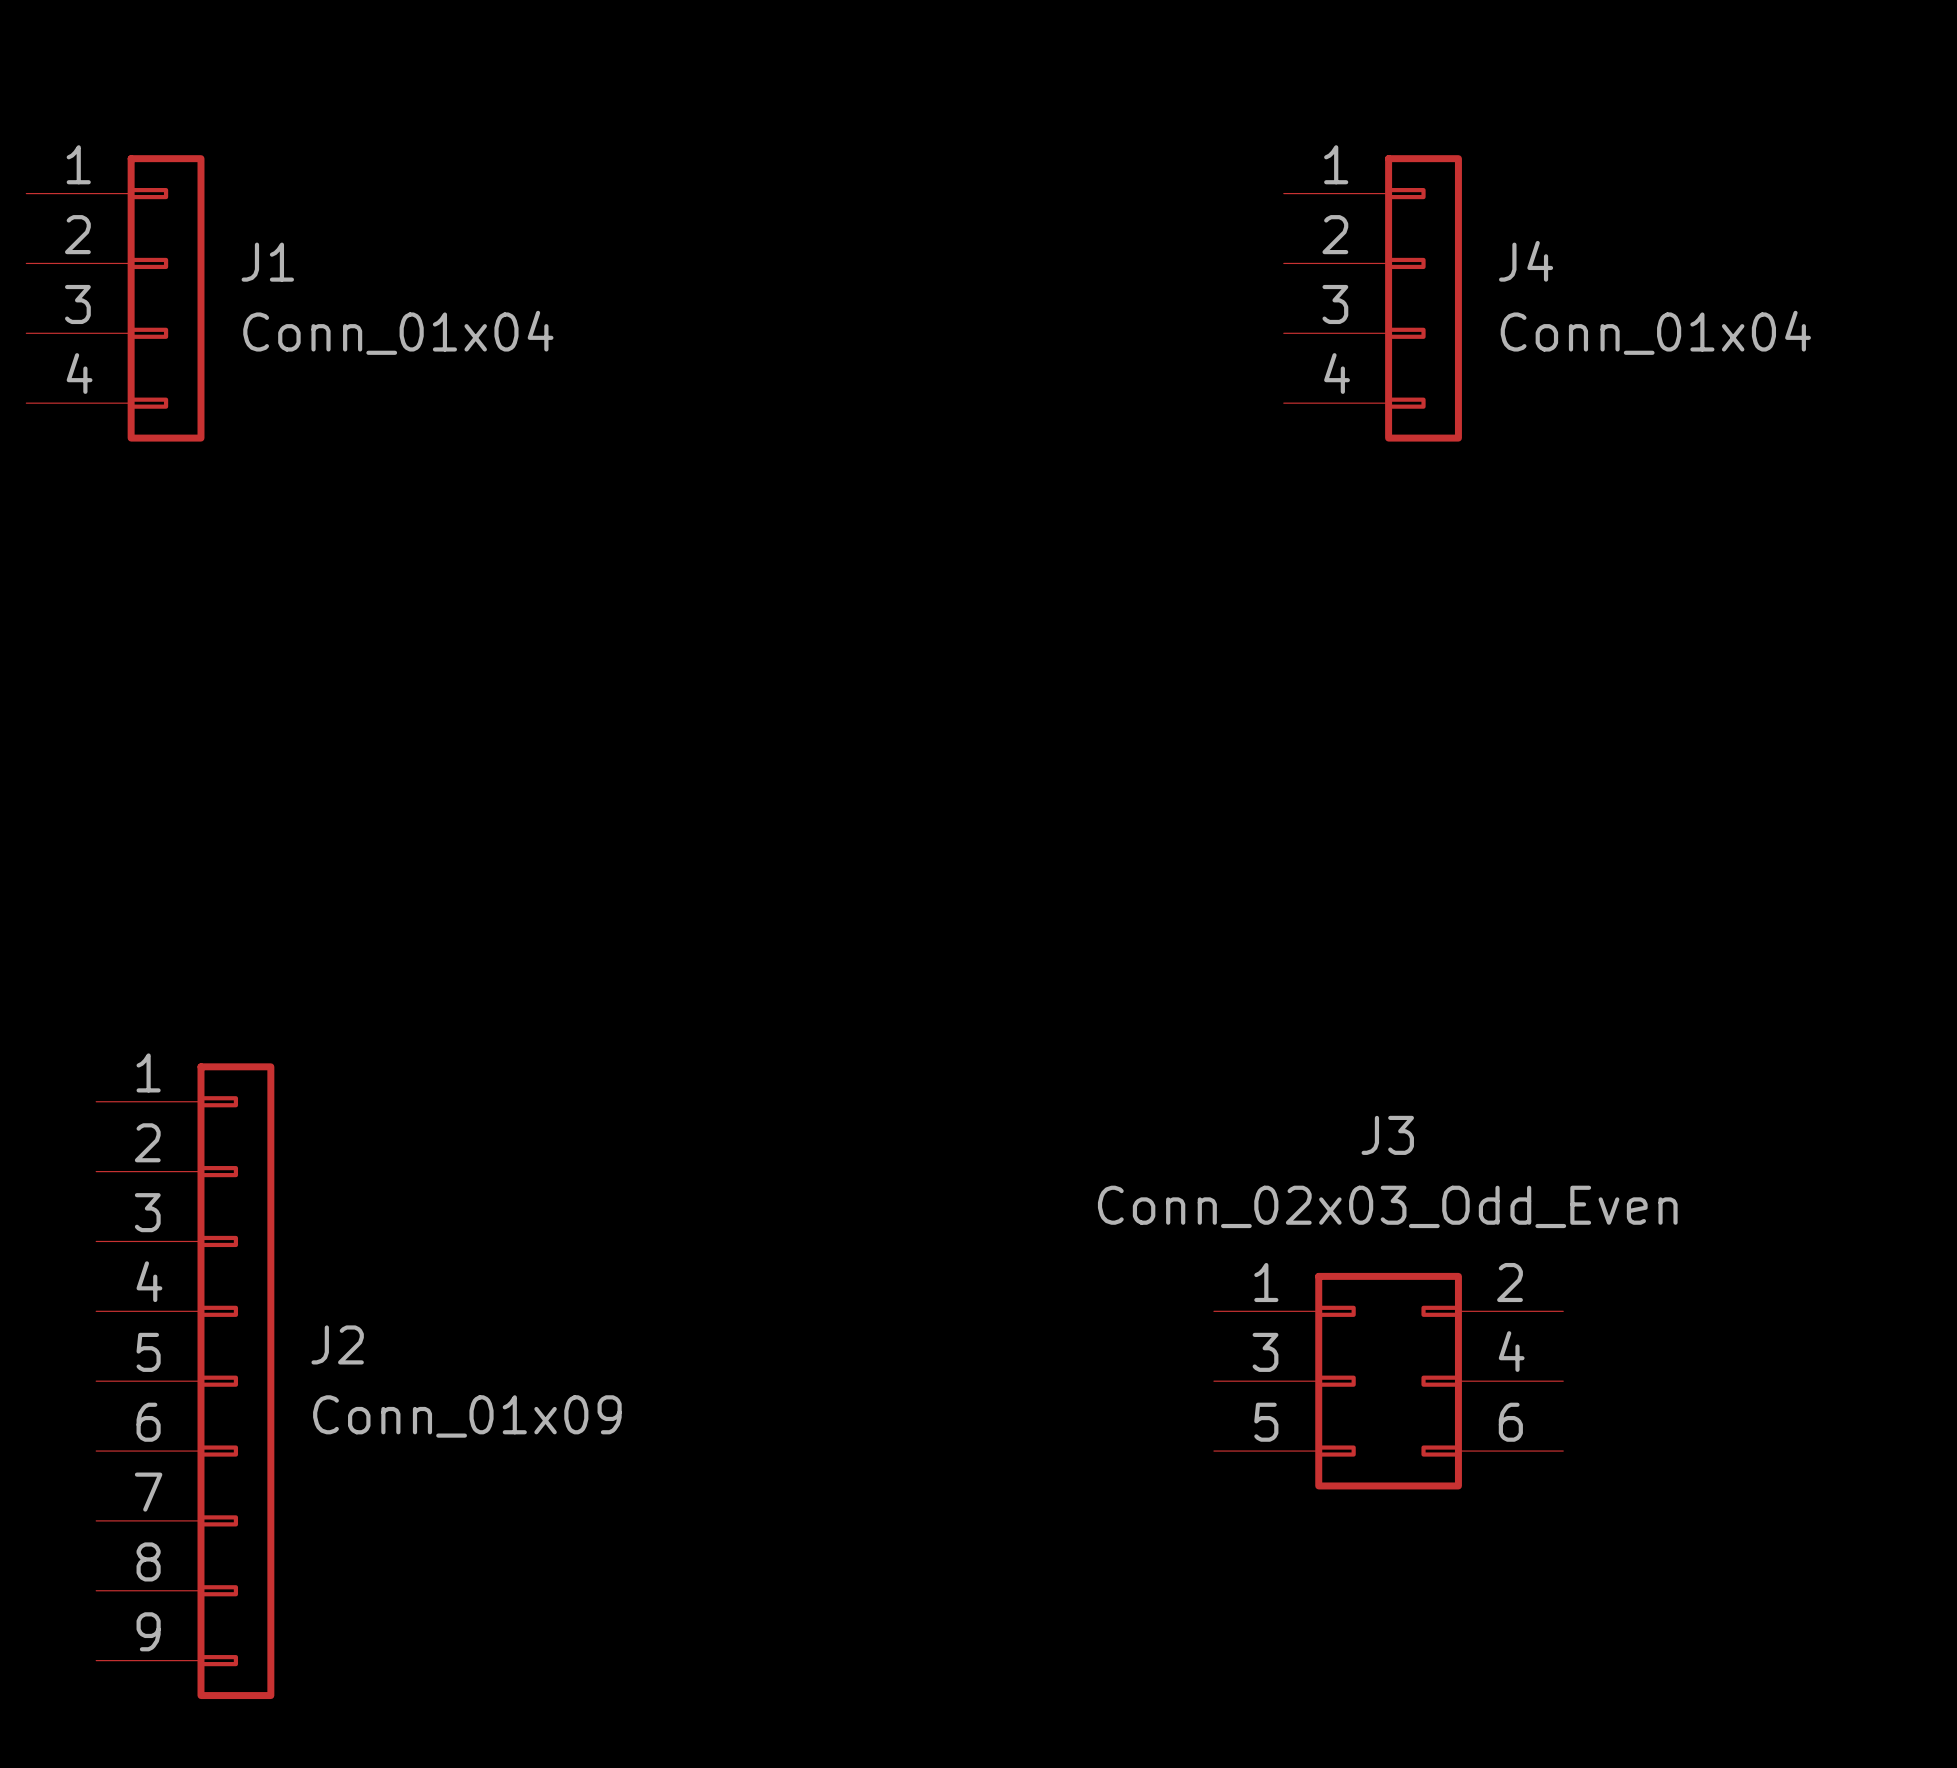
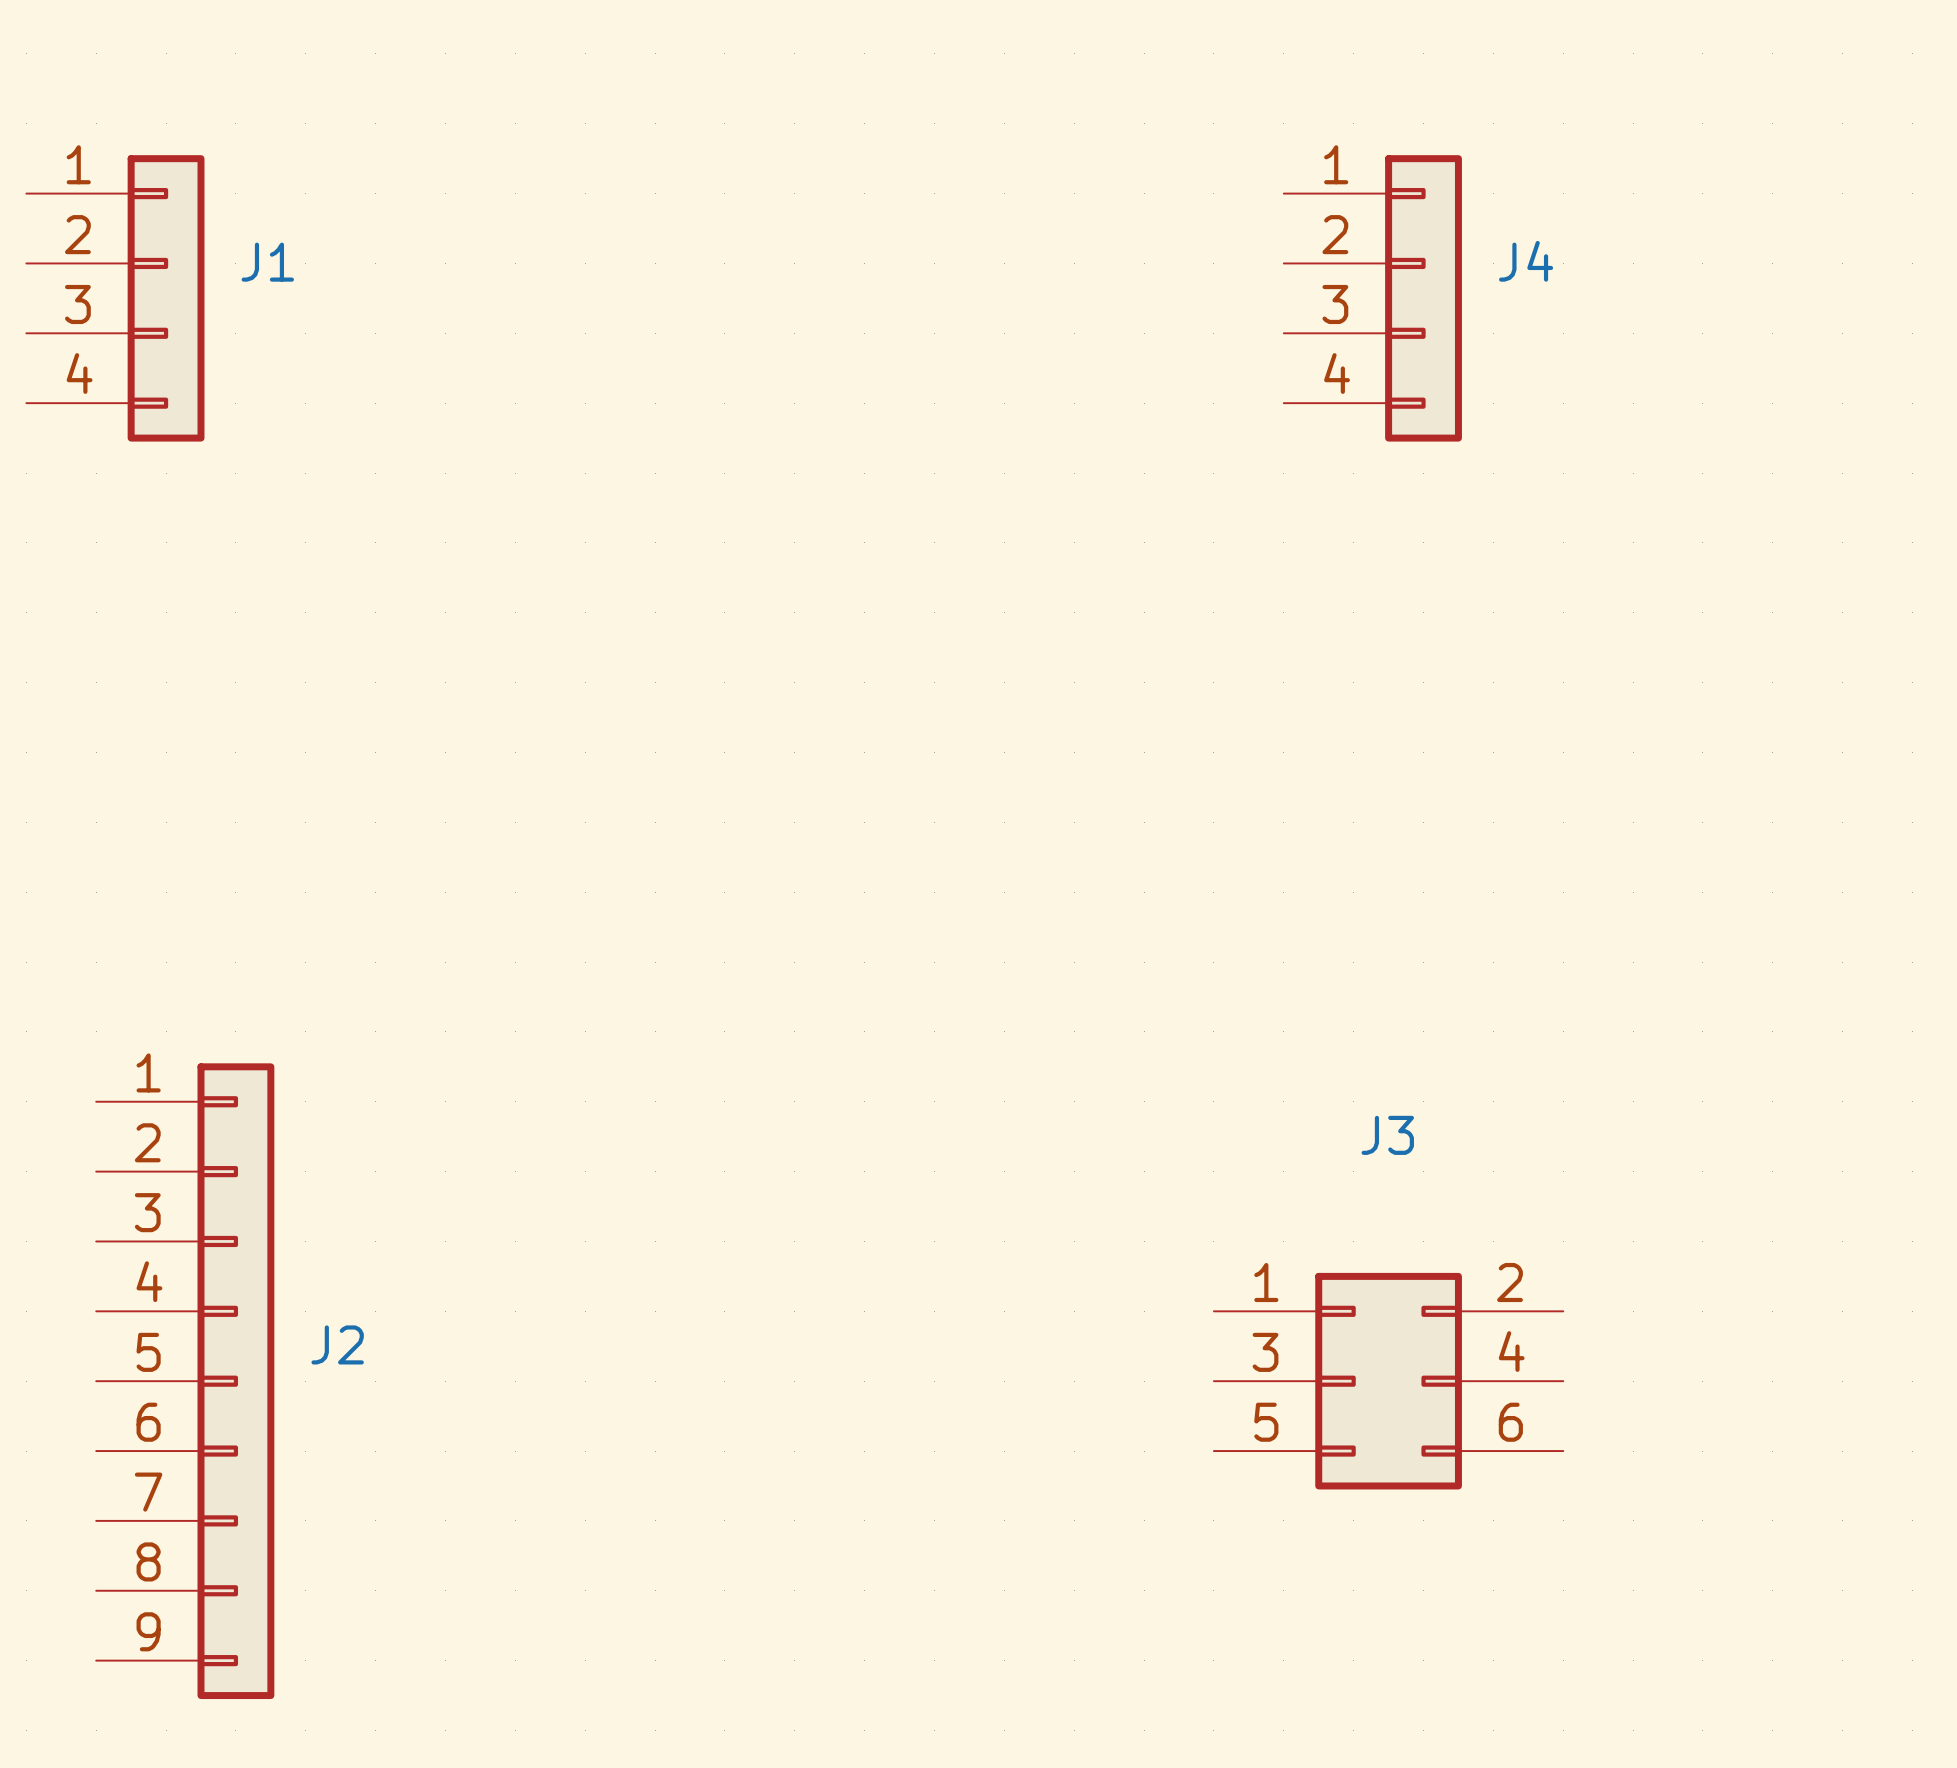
J1 value: Conn_01x04 (398, 332) -> none
J4 value: Conn_01x04 (1655, 332) -> none
J3 value: Conn_02x03_Odd_Even (1387, 1206) -> none
J2 value: Conn_01x09 (467, 1416) -> none

